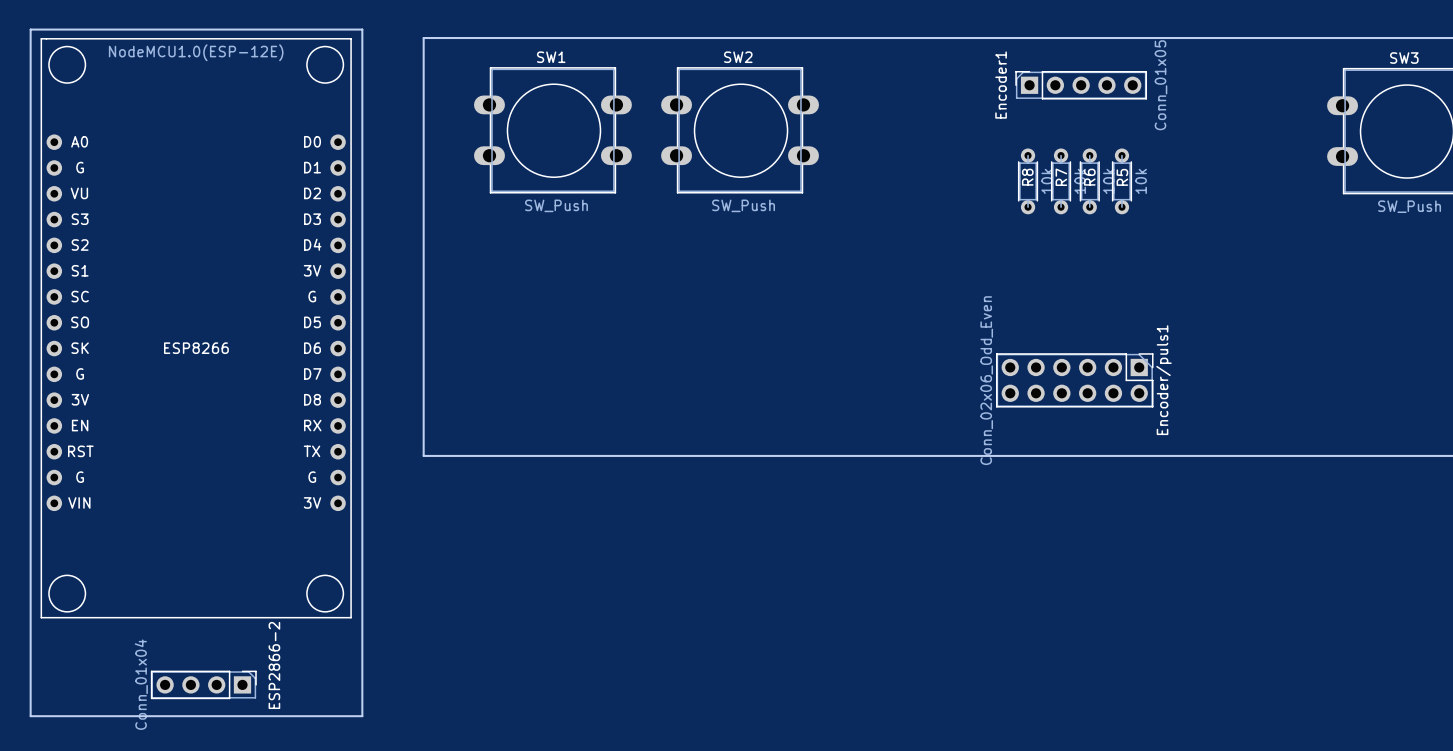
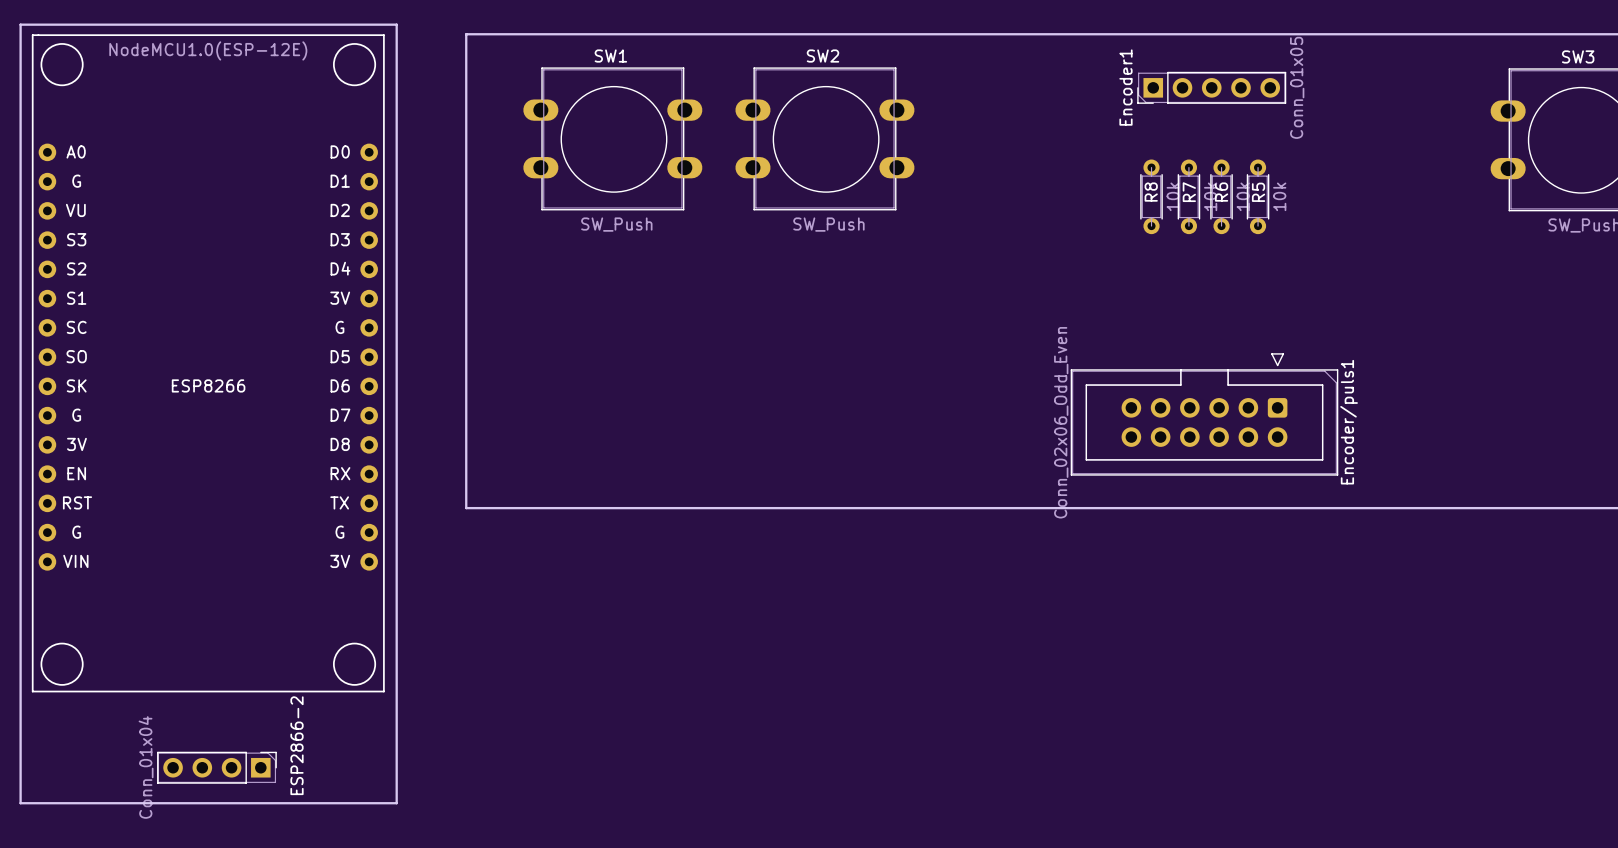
Encoder1 footprint: [1015, 71, 1147, 100] -> [1137, 71, 1287, 104]
Encoder/puls1 footprint: [996, 353, 1154, 408] -> [1070, 353, 1339, 476]
Encoder/puls1 value position: Conn_02x06_Odd_Even (986, 380) -> Conn_02x06_Odd_Even (1061, 422)
Encoder/puls1 name position: Encoder/puls1 (1163, 380) -> Encoder/puls1 (1349, 422)

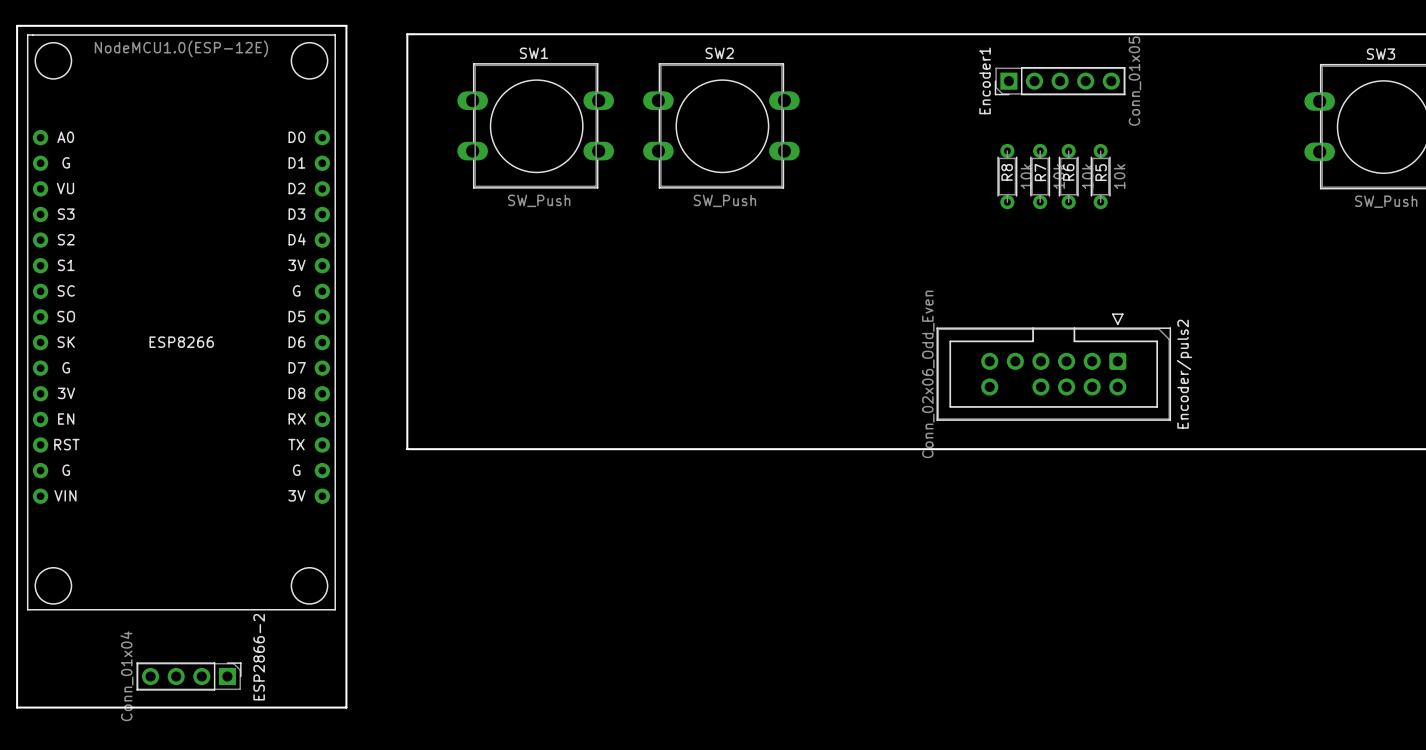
Encoder/puls1: Conn_02x06_Odd_Even (1204, 414) -> none
Encoder/puls2: none -> Conn_02x06_Odd_Even (1053, 367)

